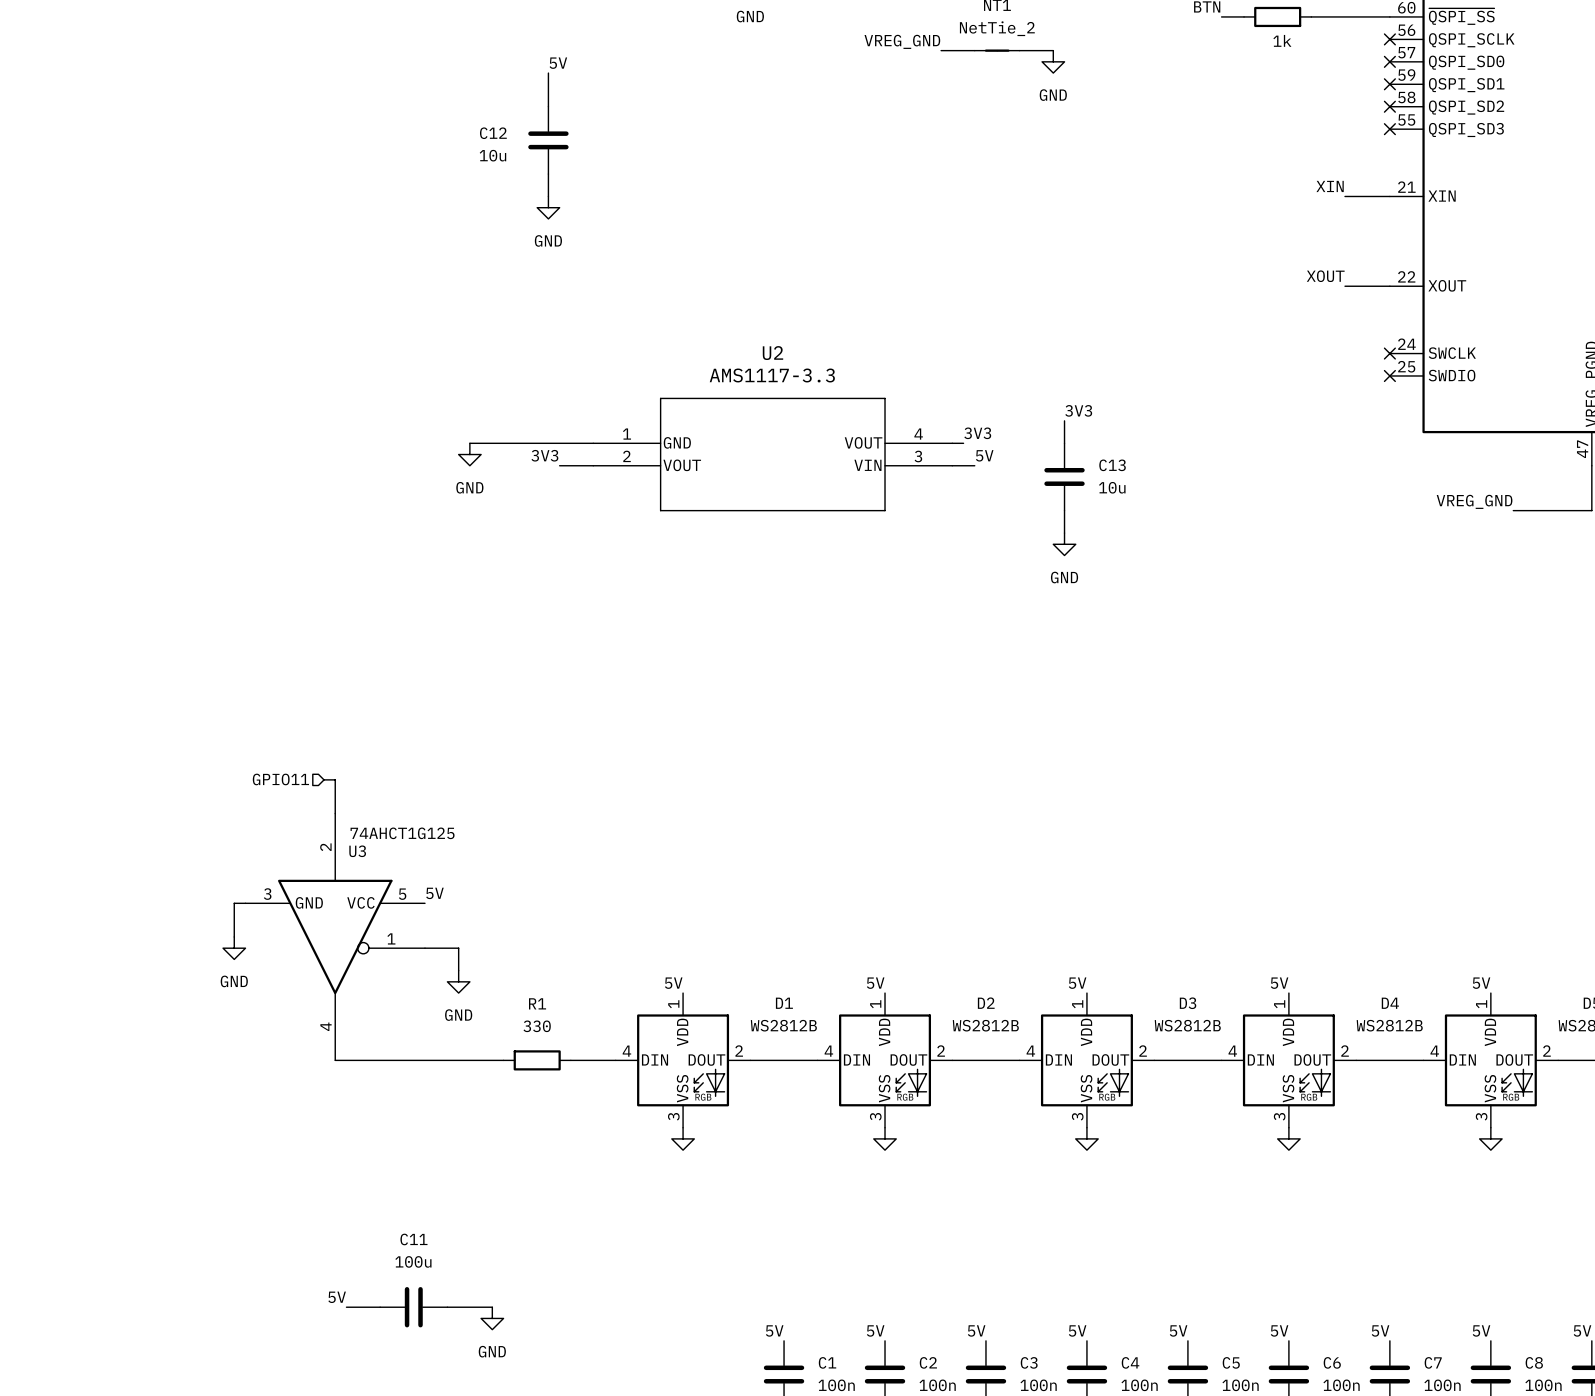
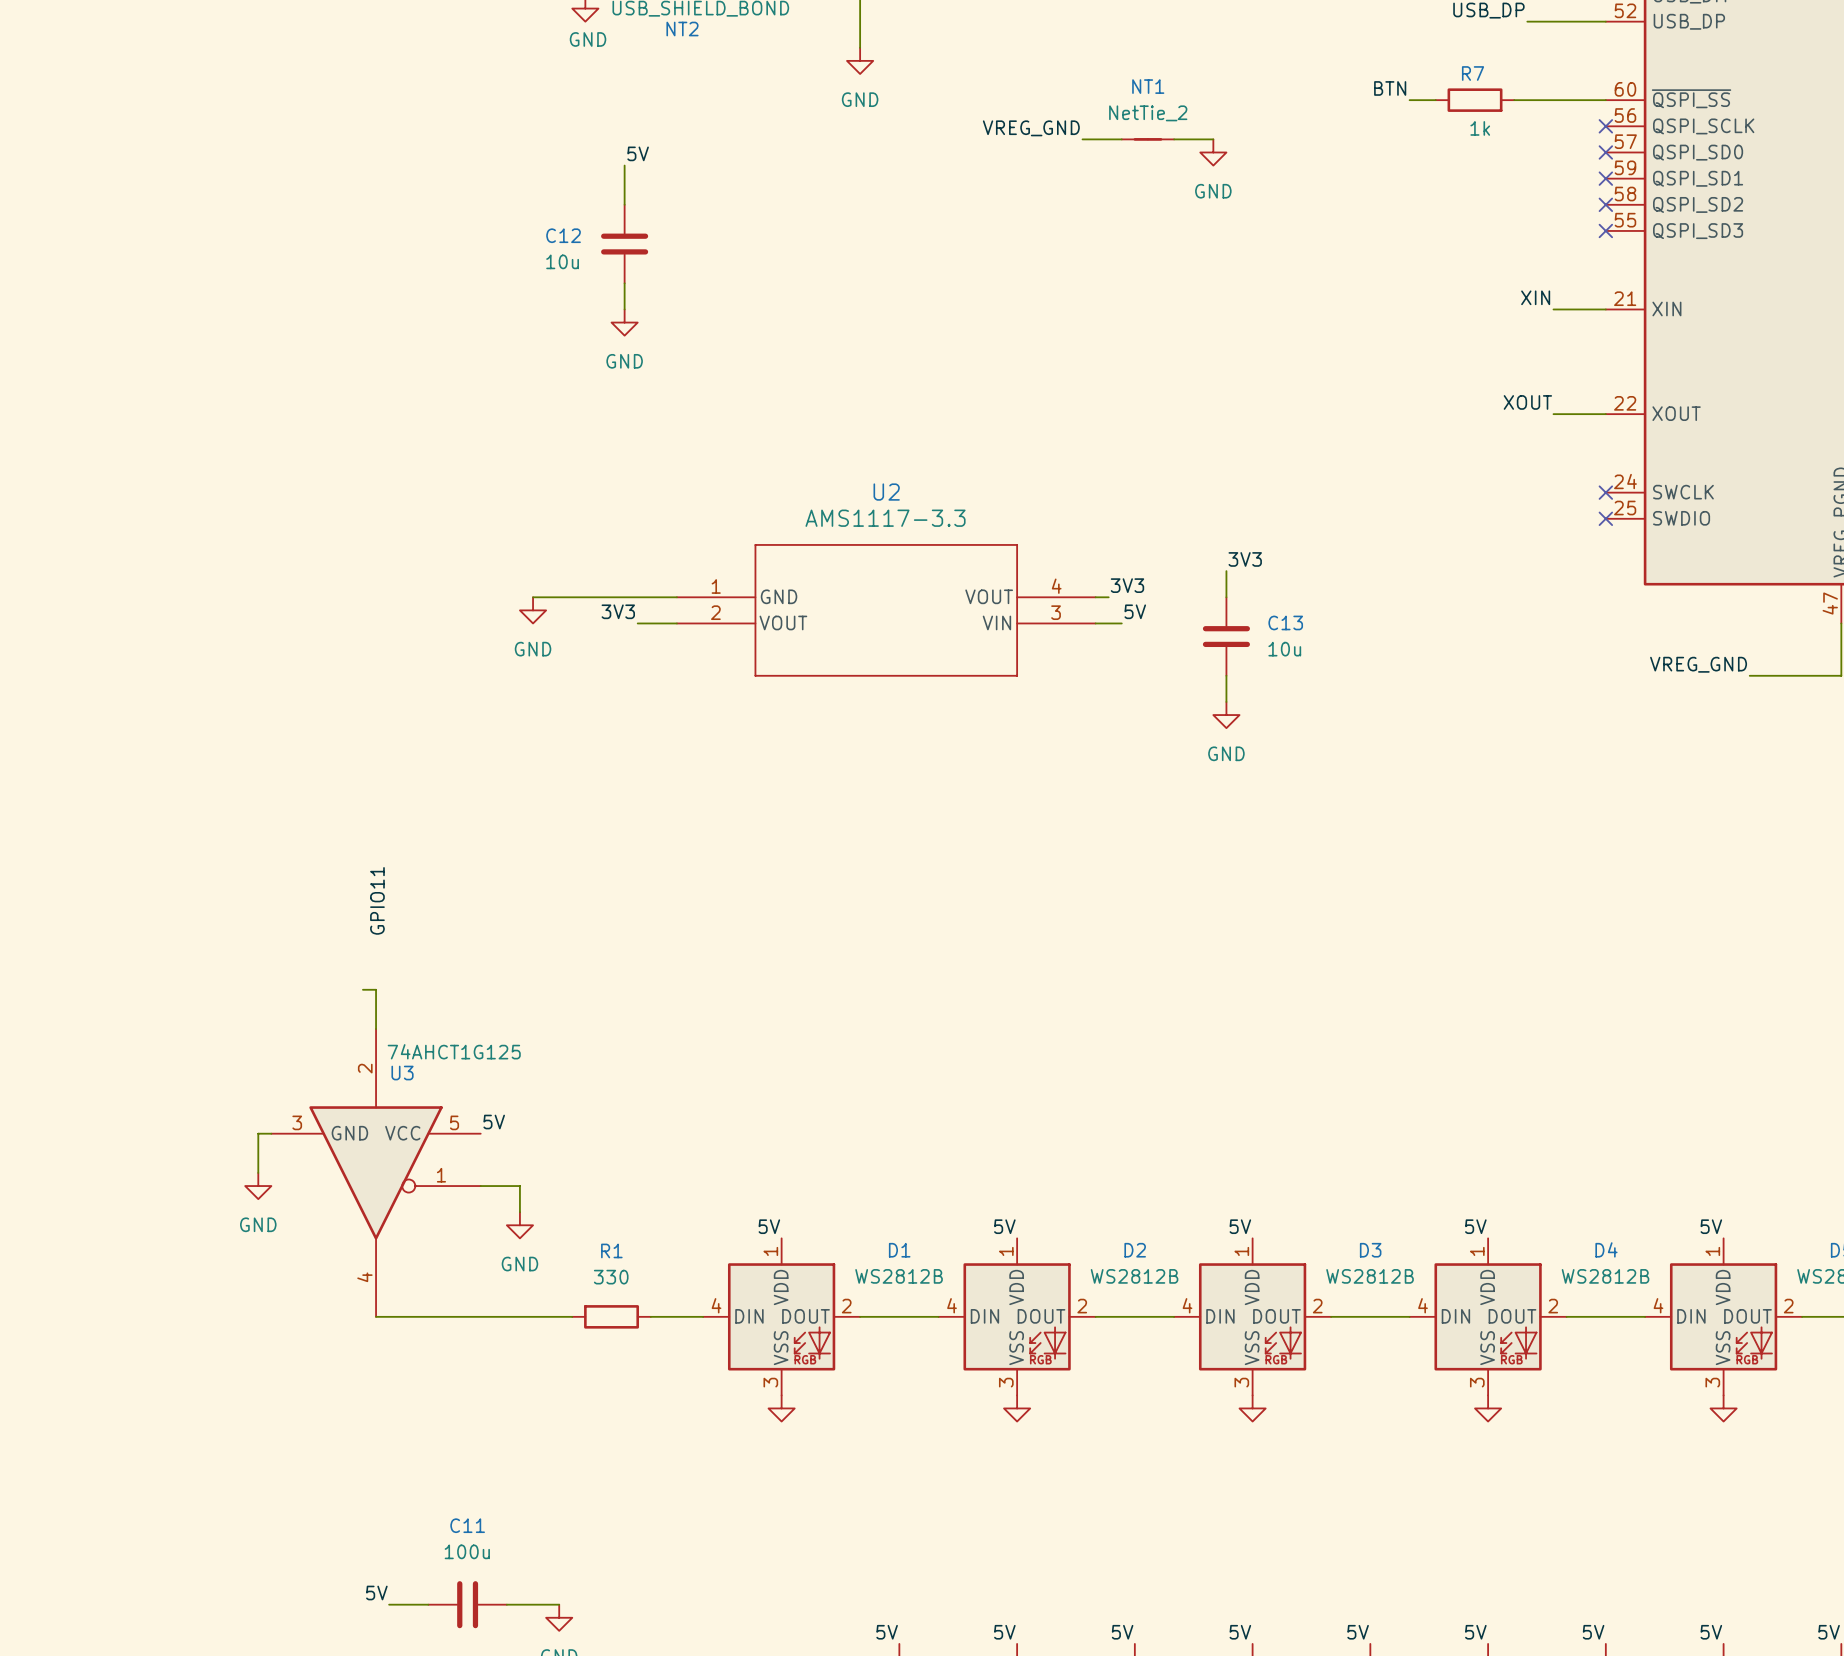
label: none -> GPIO11 (377, 900)
hierarchical label: GPIO11 (280, 779) -> none

